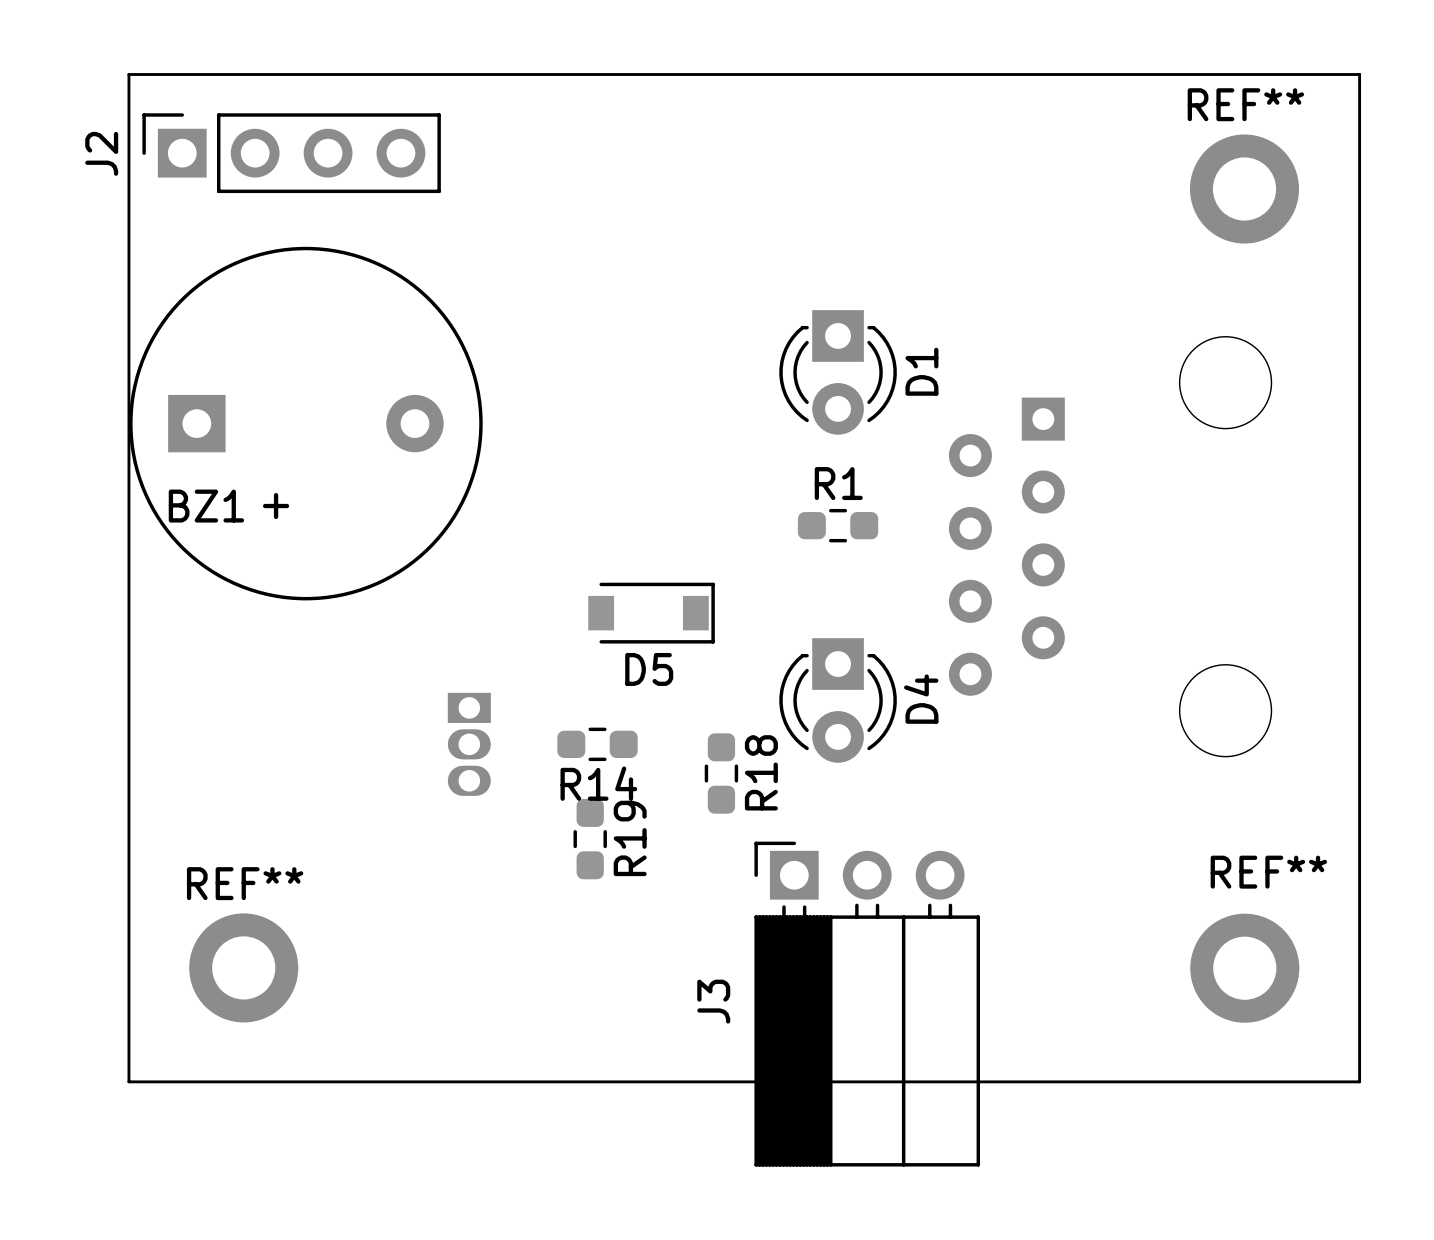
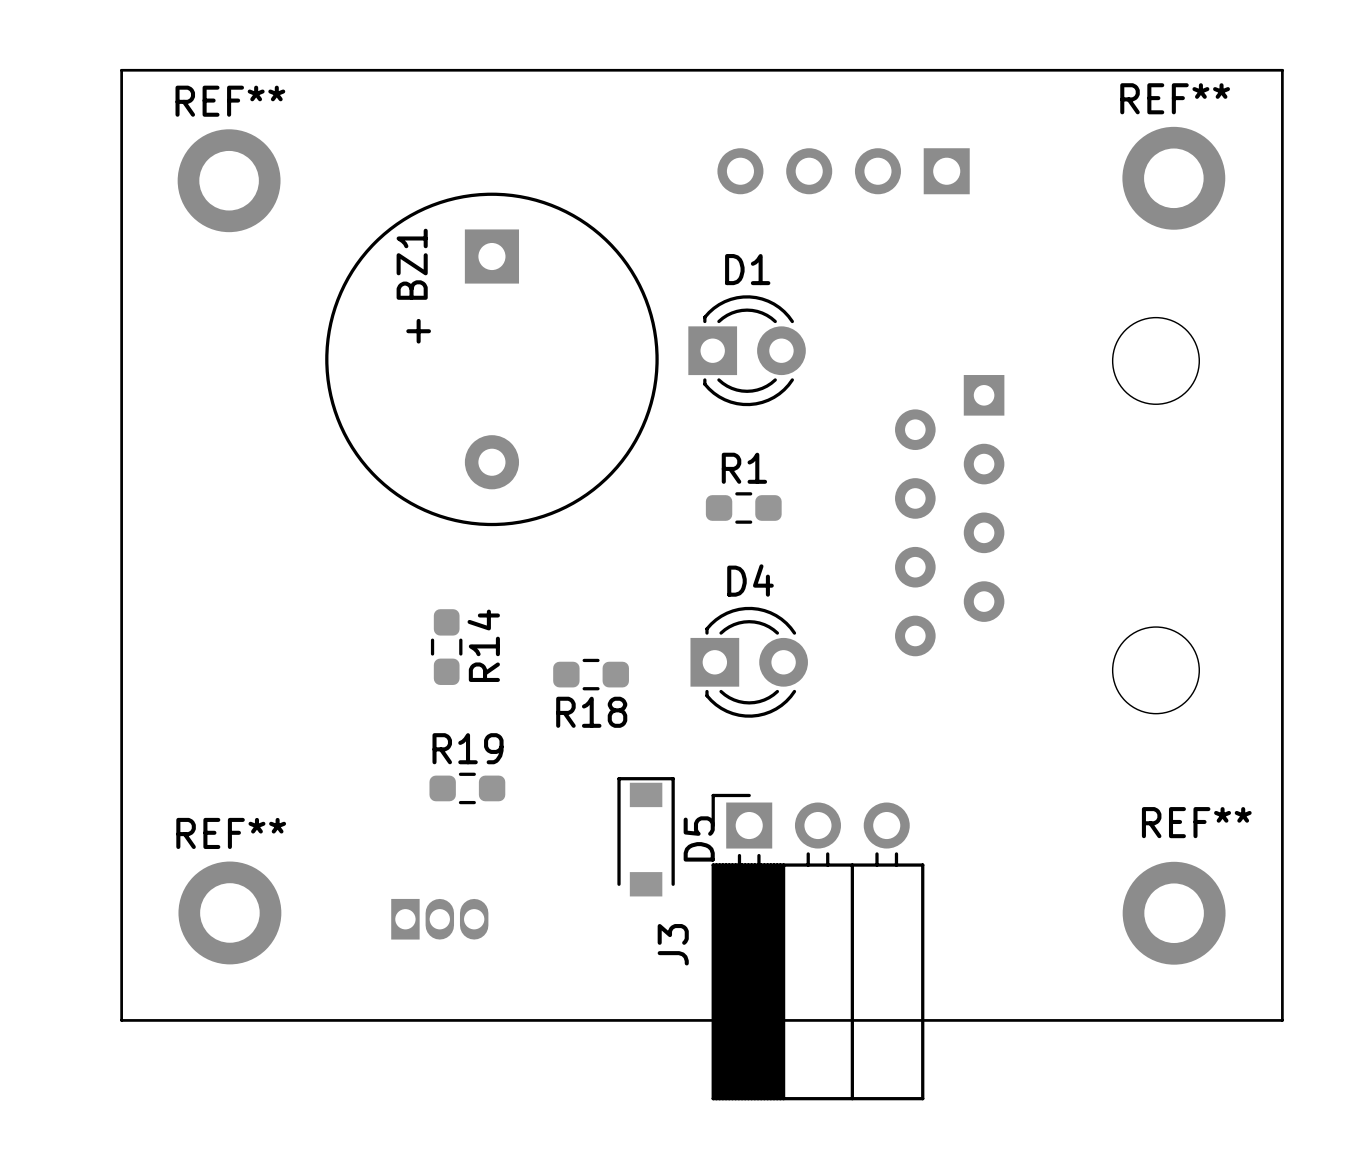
J2 side: top (291, 153) -> bottom (843, 171)
REF**: none -> (229, 180)
D1 rotation: 0° (838, 372) -> 90° counterclockwise (747, 350)
BZ1 rotation: 0° (305, 423) -> 90° clockwise (491, 359)
BZ1 position: (305, 423) -> (491, 359)
R1 position: (838, 525) -> (743, 507)
D5 rotation: 0° (651, 613) -> 90° counterclockwise (646, 836)
D5 position: (651, 613) -> (646, 836)
D4 rotation: 0° (838, 700) -> 90° counterclockwise (749, 662)
part rotation: 0° (469, 744) -> 90° counterclockwise (439, 919)
part position: (469, 744) -> (439, 919)
R14 rotation: 0° (597, 744) -> 90° clockwise (446, 647)
R14 position: (597, 744) -> (446, 647)
R18 rotation: 0° (721, 773) -> 90° clockwise (591, 674)
R18 position: (721, 773) -> (591, 674)
R14 name position: R14 (598, 783) -> R14 (483, 645)
R19 name position: R19 (630, 838) -> R19 (468, 748)
R19 rotation: 0° (590, 839) -> 90° clockwise (467, 788)
R19 position: (590, 839) -> (467, 788)

